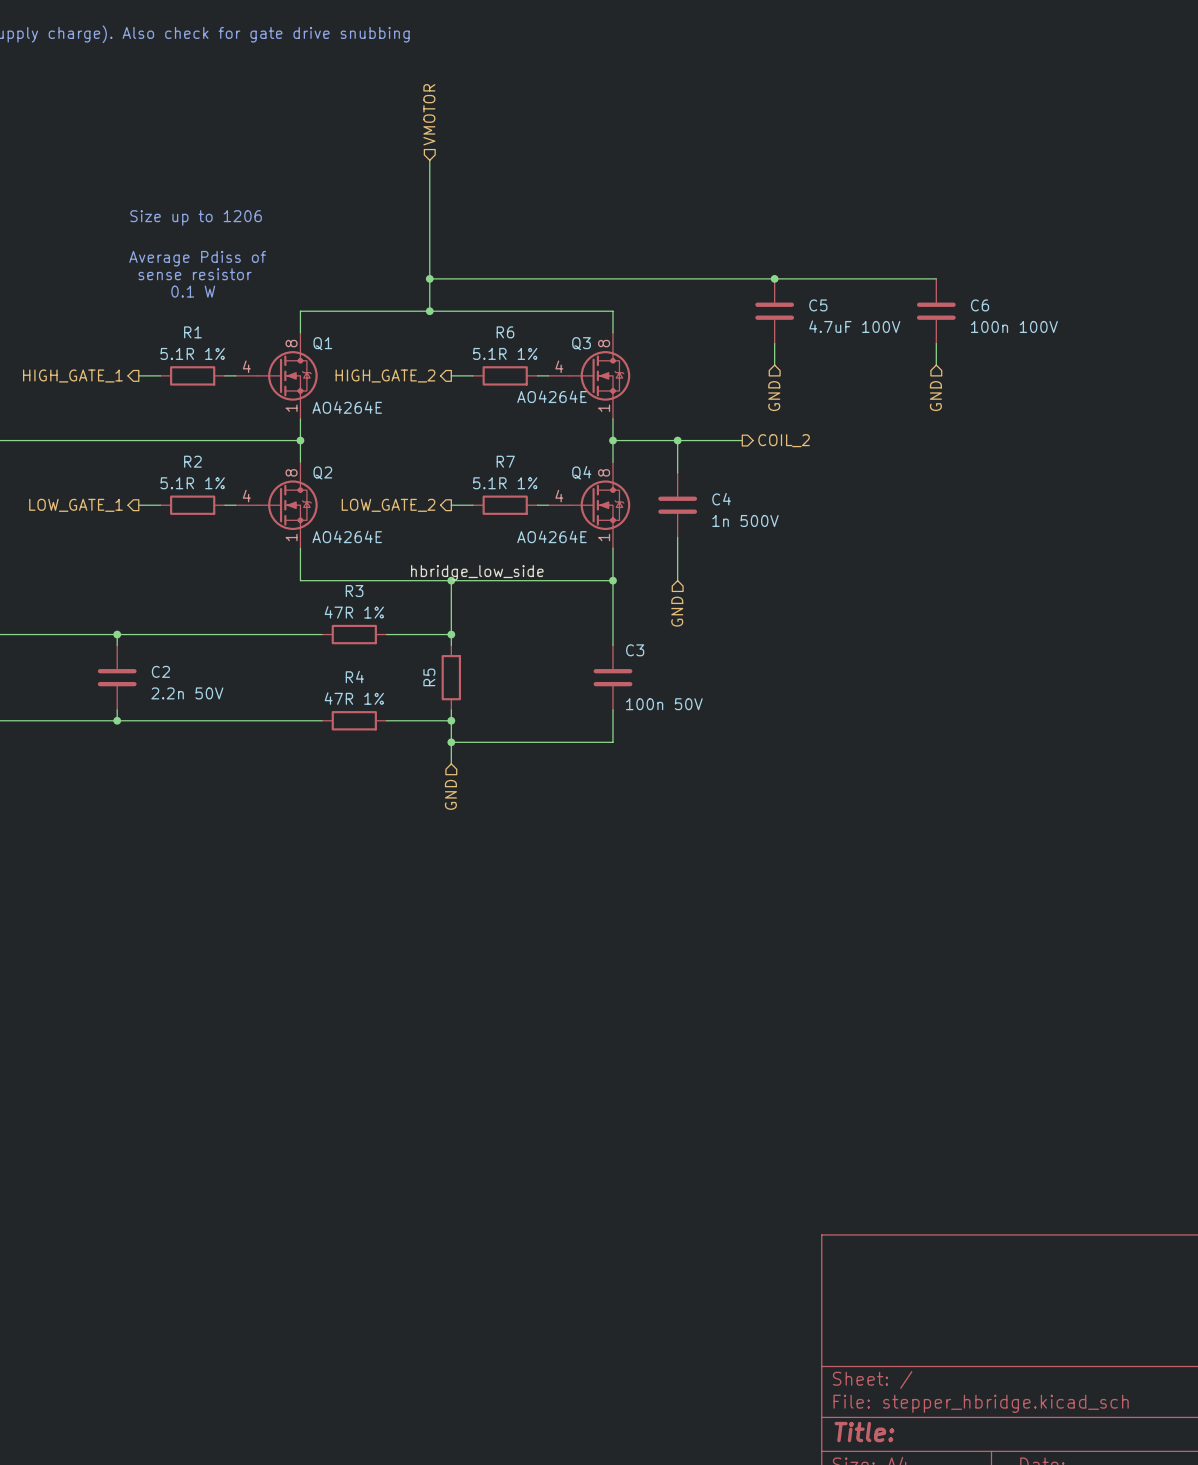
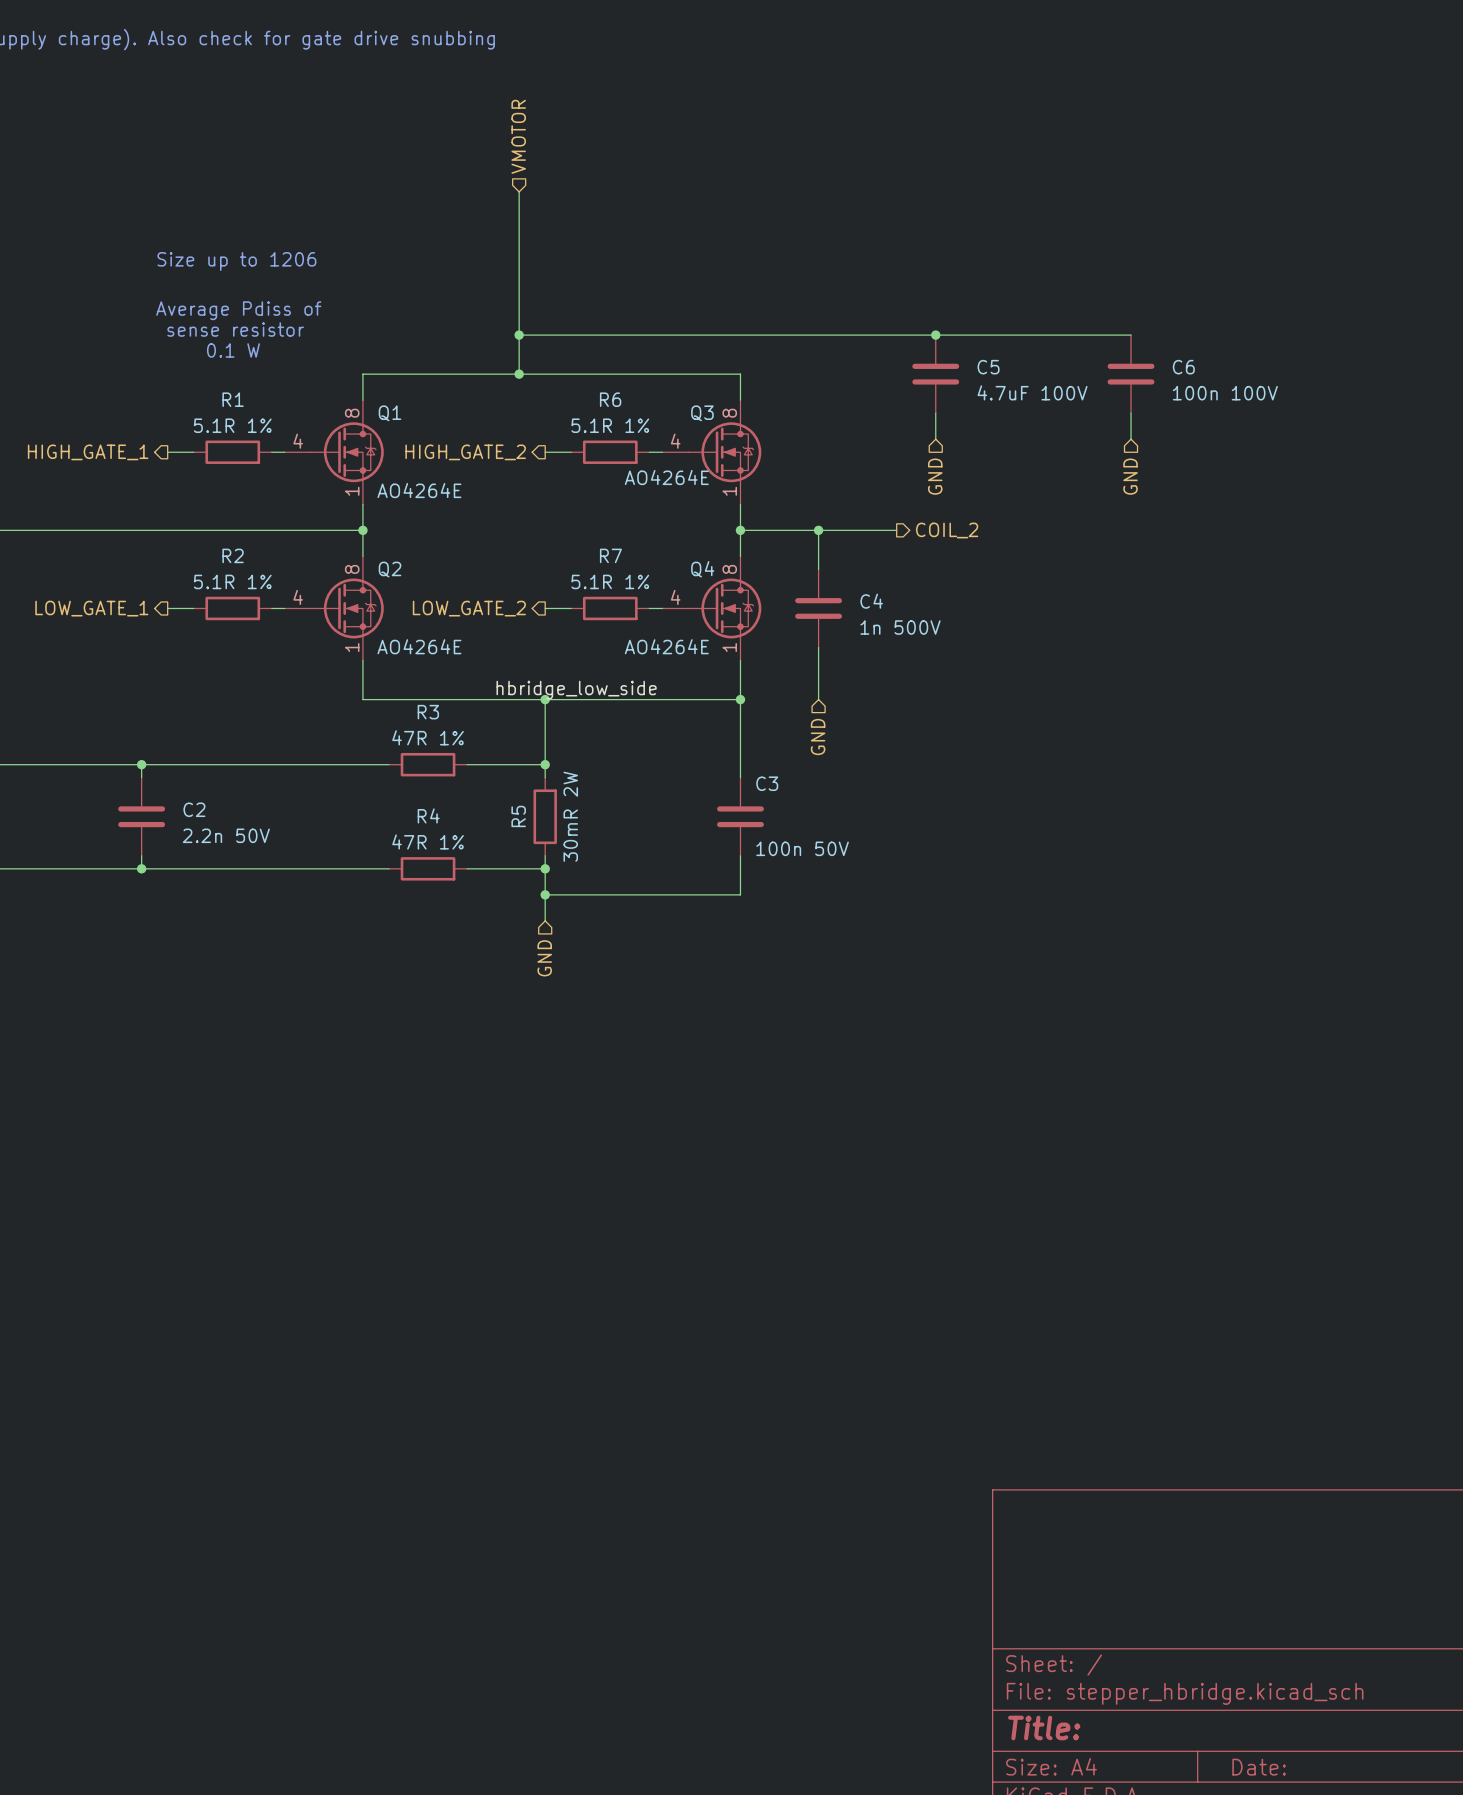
R5 value: none -> 30mR 2W (570, 816)

